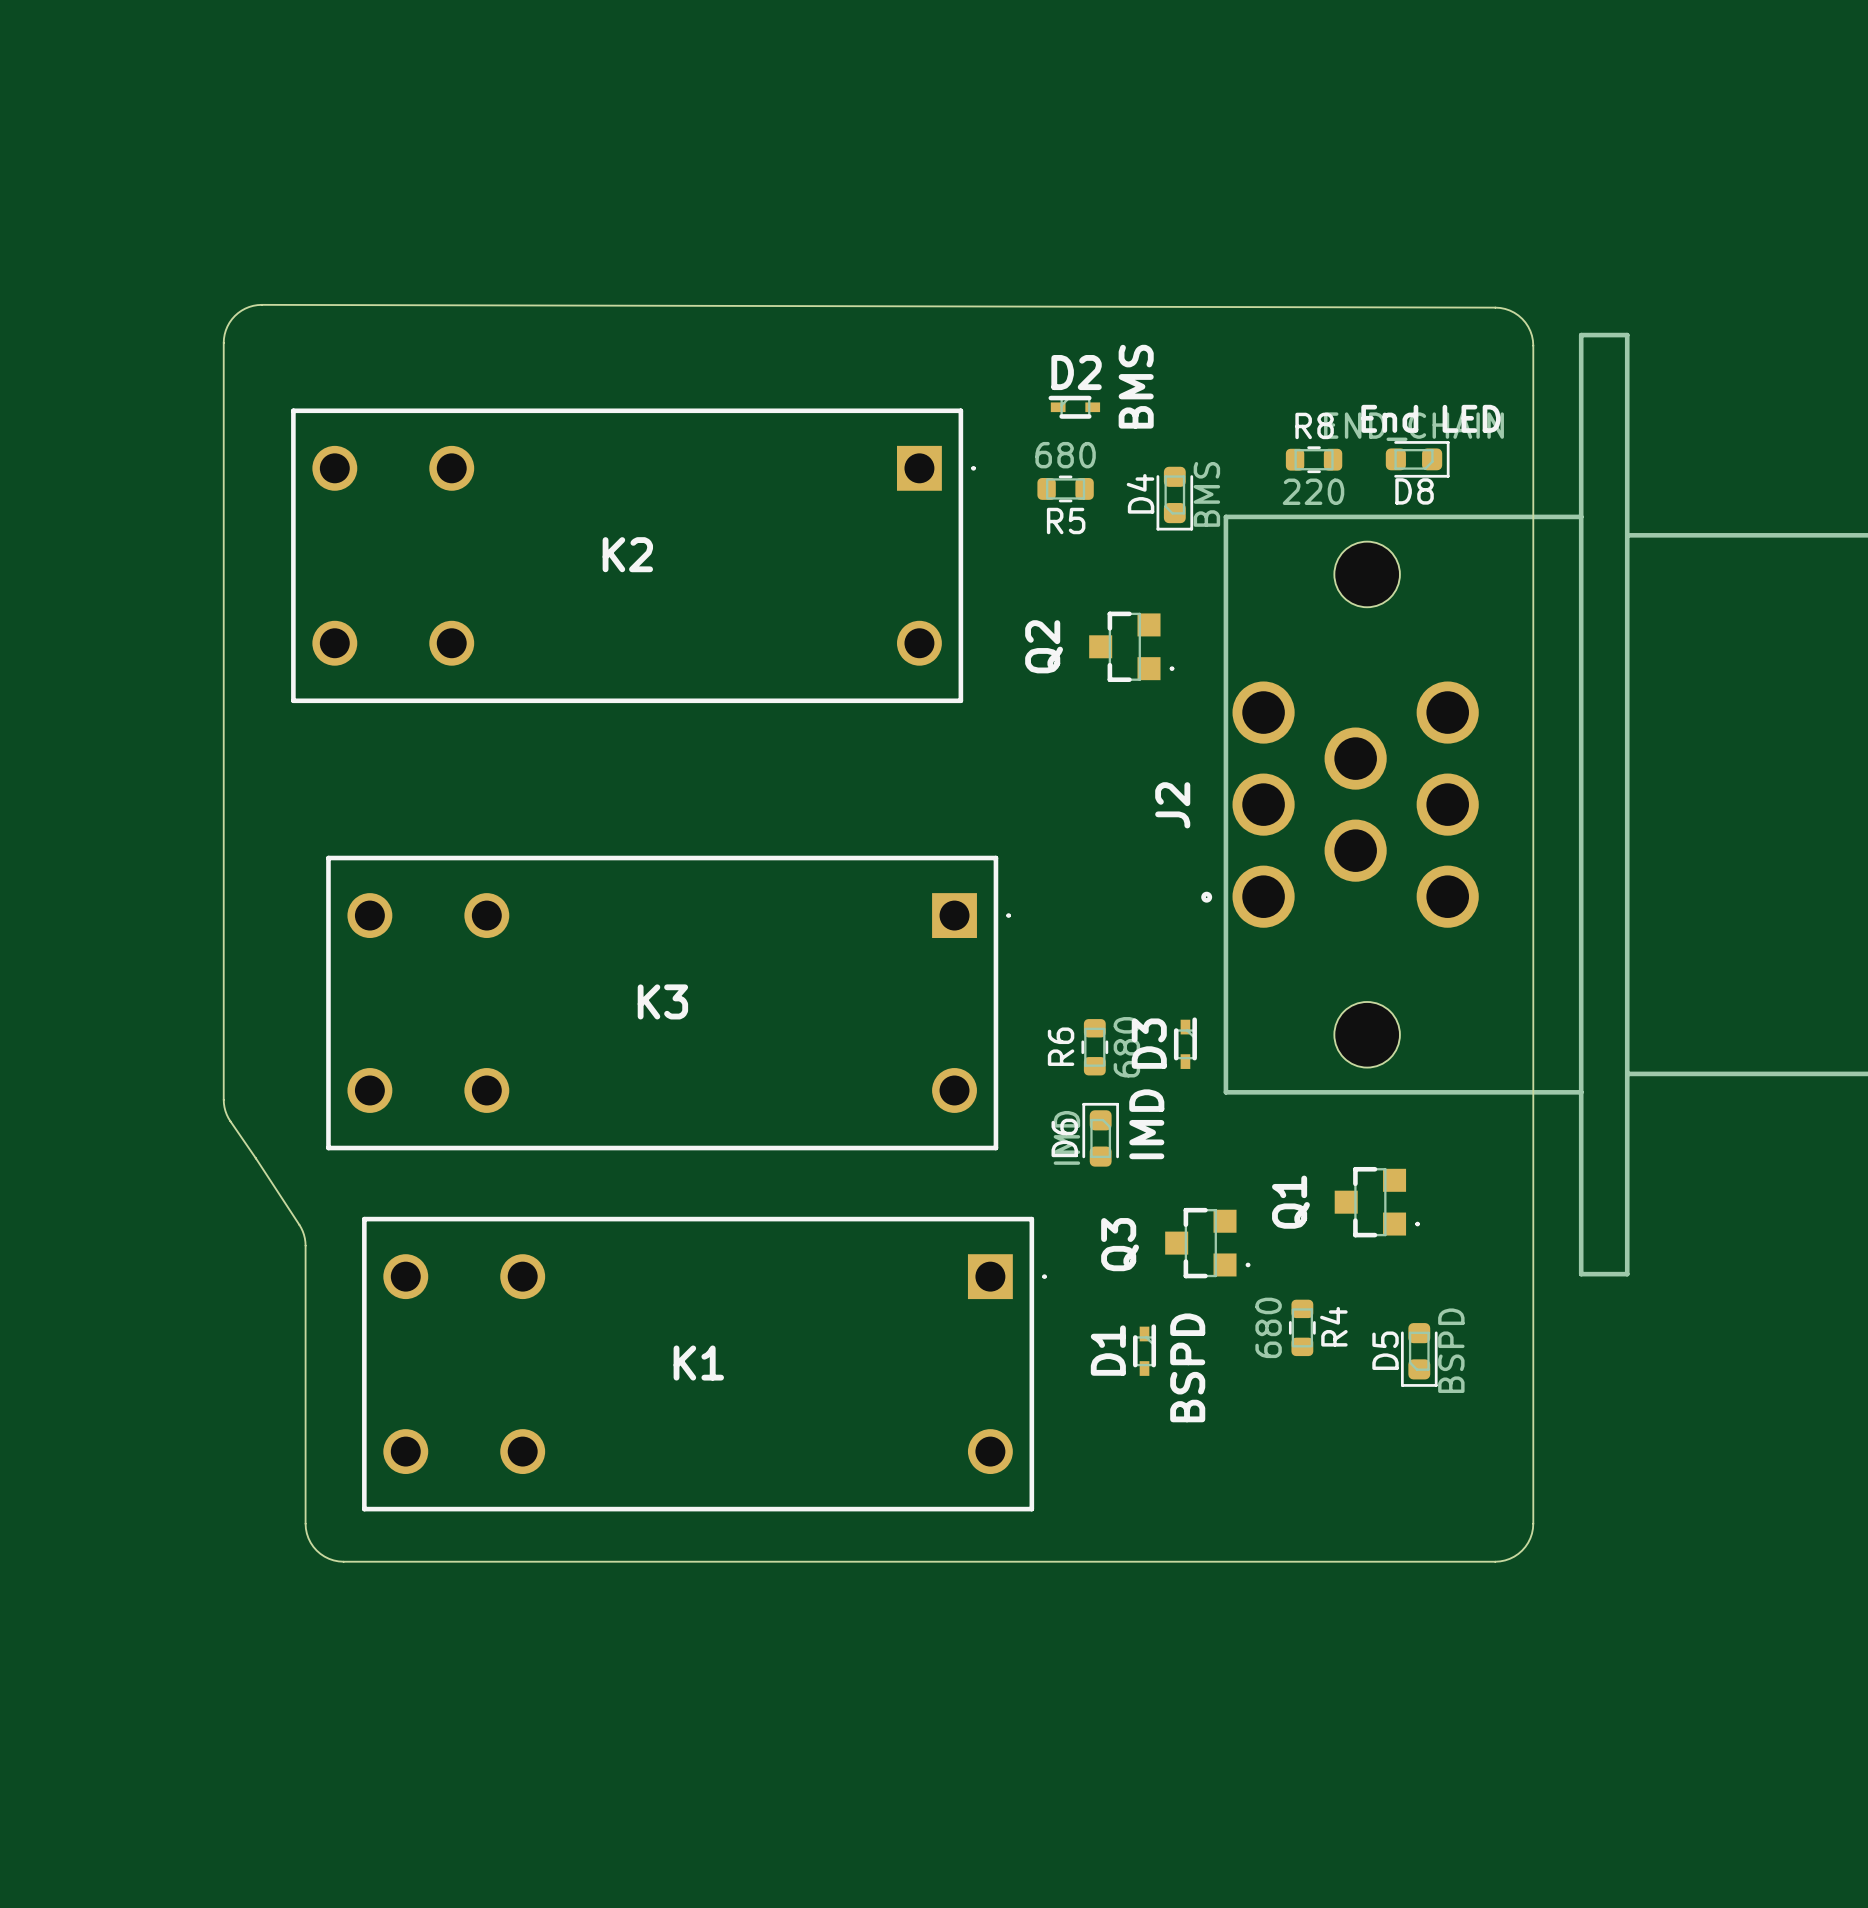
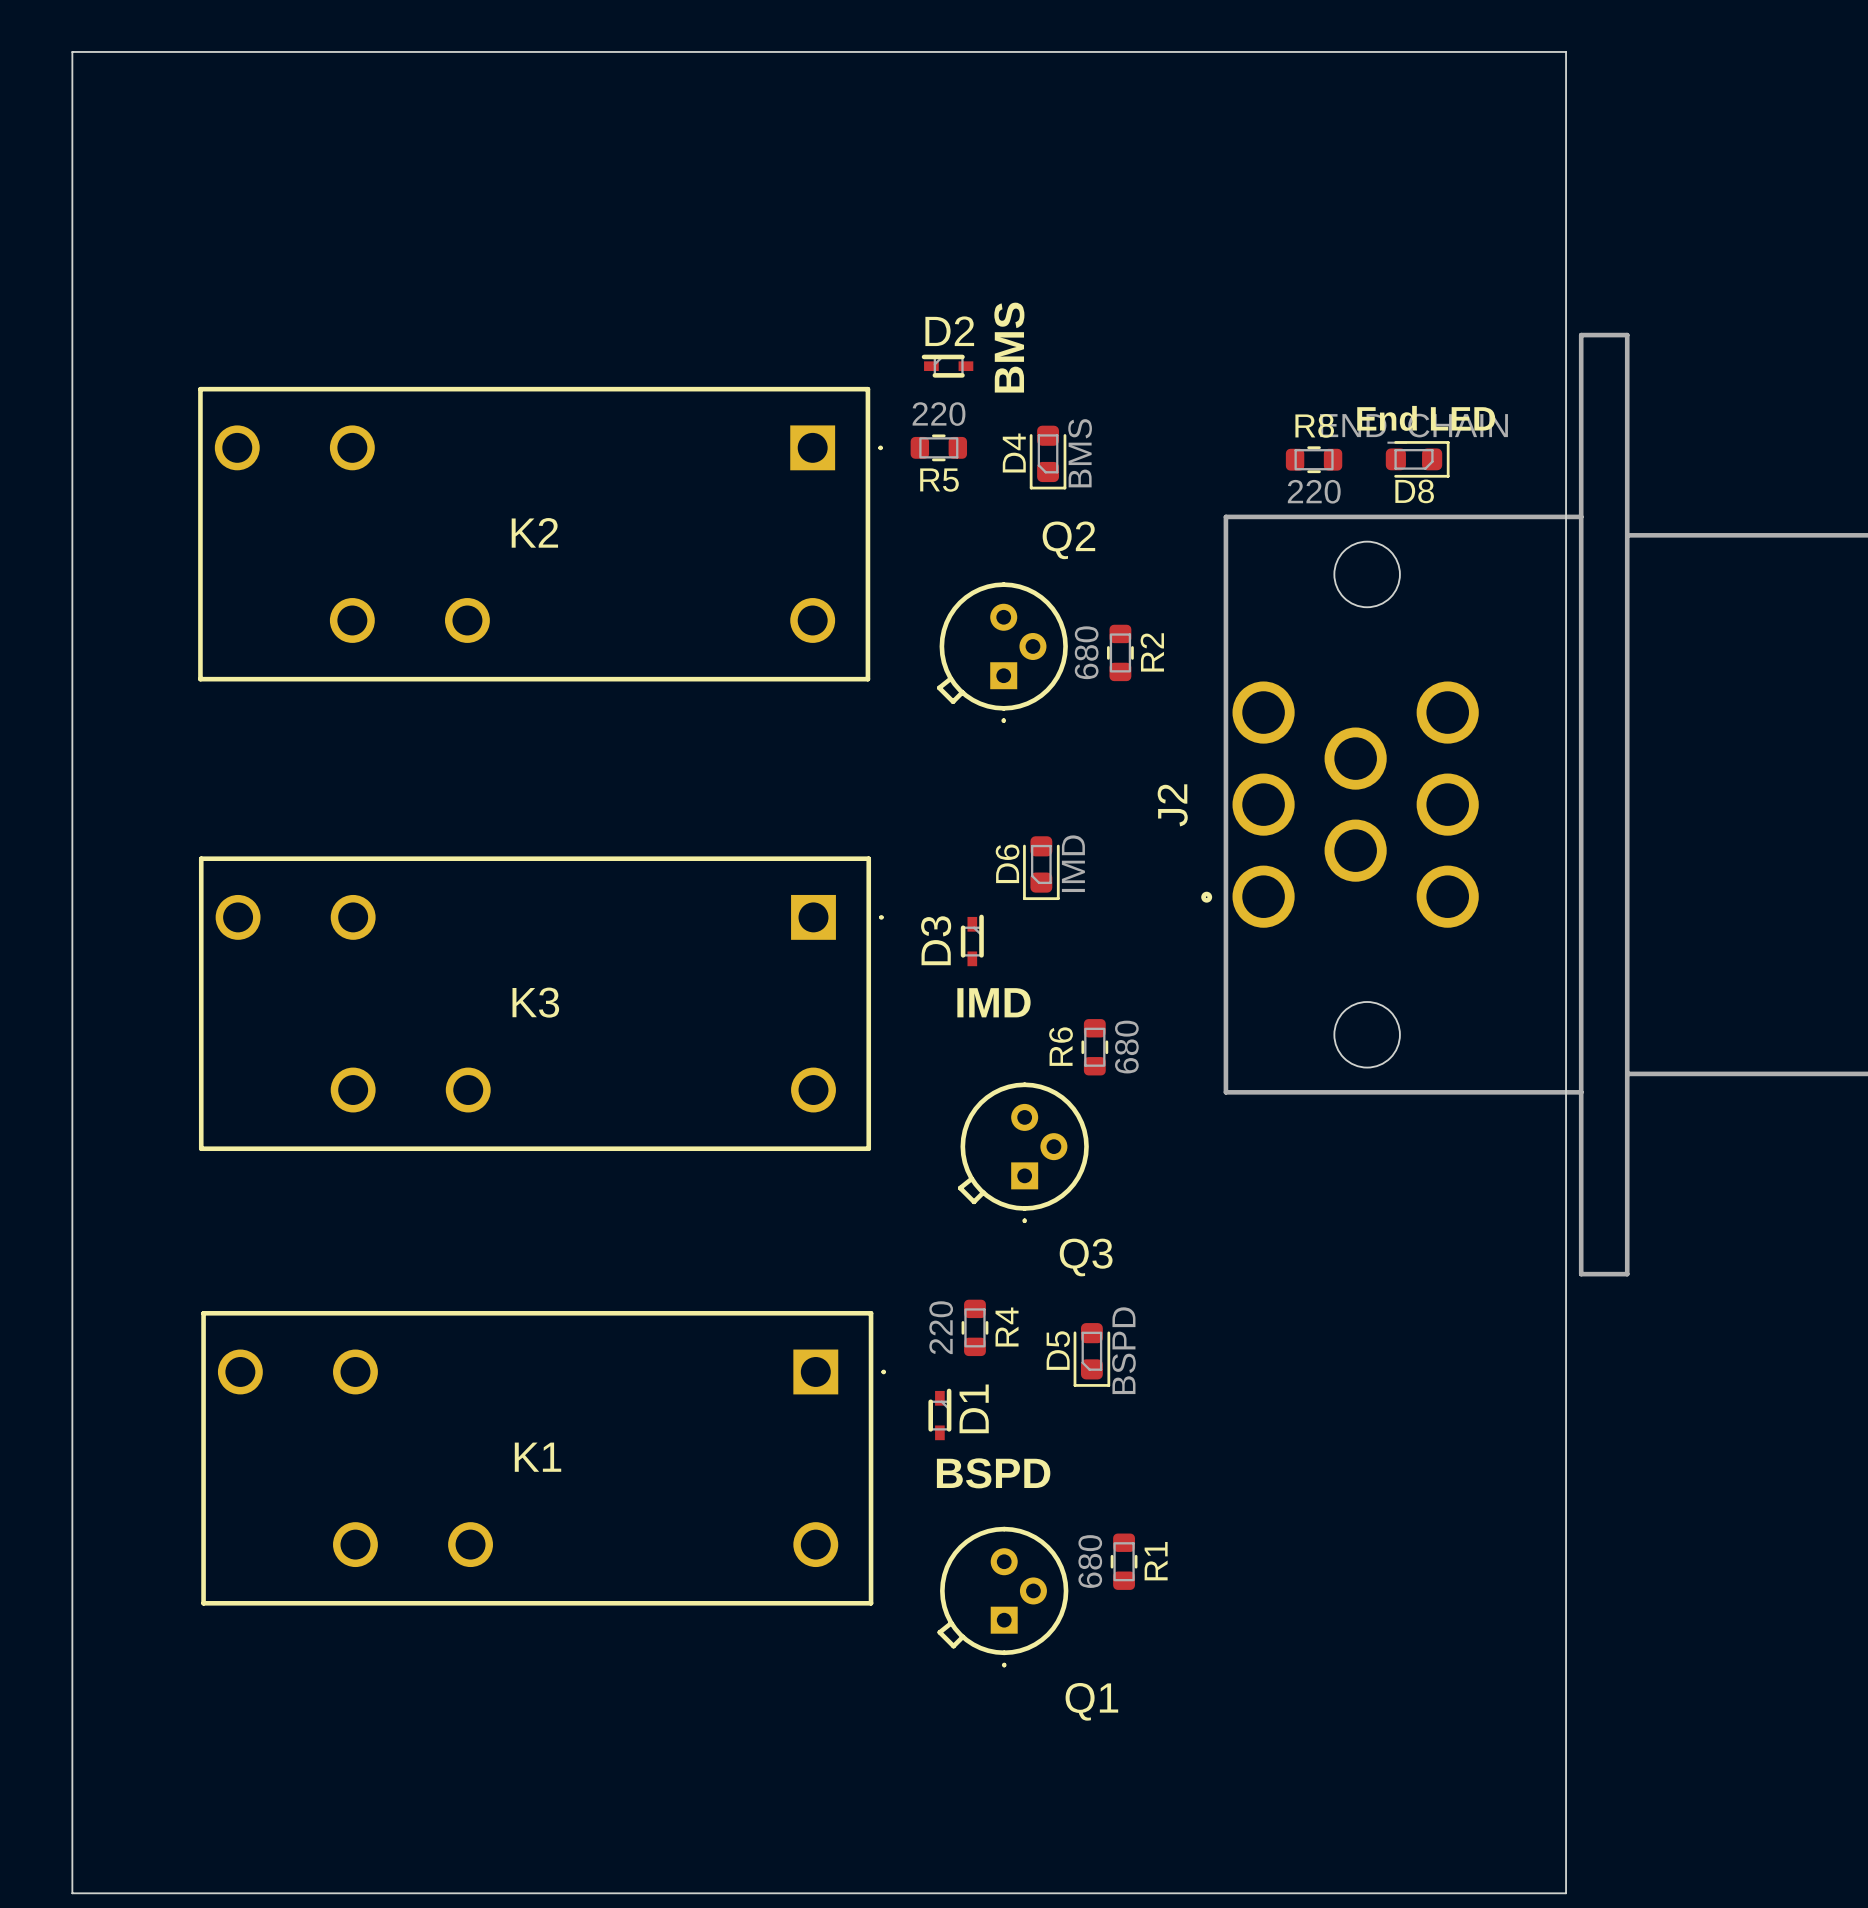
board edge: (261, 304) (1495, 307) (1509, 310) (1522, 318) (1530, 331) (1533, 345) (1533, 1523) (1530, 1538) (1522, 1550) (1509, 1558) (1495, 1561) (343, 1561) (329, 1558) (316, 1550) (308, 1538) (305, 1523) (304, 1238) (299, 1224) (228, 1118) (223, 1099) (223, 342) (227, 326) (234, 315) (245, 308) (261, 304) -> (72, 51) (72, 1893) (1566, 1893) (1566, 51) (72, 51)
text position: BMS (1136, 386) -> BMS (1009, 347)
D2 position: (1074, 407) -> (947, 366)
K2 footprint: [291, 408, 976, 704] -> [198, 386, 883, 682]
R5 value: 680 (1065, 455) -> 220 (939, 414)
R5 position: (1065, 488) -> (938, 447)
D4 position: (1174, 498) -> (1048, 457)
Q2 footprint: [1089, 611, 1175, 683] -> [936, 582, 1068, 723]
Q2 name position: Q2 (1044, 646) -> Q2 (1068, 540)
R2: none -> 680 (1120, 652)
K3 footprint: [326, 855, 1011, 1151] -> [198, 856, 884, 1152]
D3 position: (1185, 1043) -> (972, 940)
text rotation: 0° (1146, 1124) -> 90° clockwise (993, 1002)
text position: IMD (1146, 1124) -> IMD (993, 1002)
D6 rotation: 0° (1100, 1134) -> 180° (1041, 868)
D6 position: (1100, 1134) -> (1041, 868)
Q1 footprint: [1334, 1166, 1420, 1238] -> [937, 1526, 1069, 1668]
Q1 name position: Q1 (1290, 1202) -> Q1 (1091, 1701)
Q3 footprint: [1165, 1207, 1251, 1279] -> [957, 1082, 1089, 1224]
K1 footprint: [362, 1216, 1047, 1512] -> [201, 1310, 887, 1606]
Q3 name position: Q3 (1120, 1244) -> Q3 (1086, 1257)
R4 value: 680 (1268, 1327) -> 220 (941, 1327)
R4 position: (1302, 1327) -> (974, 1327)
D1 name position: D1 (1108, 1350) -> D1 (974, 1408)
D1 position: (1144, 1350) -> (939, 1414)
D5 position: (1419, 1354) -> (1091, 1354)
text rotation: 0° (1187, 1367) -> 90° clockwise (993, 1473)
text position: BSPD (1187, 1367) -> BSPD (993, 1473)
R1: none -> 680 (1124, 1561)

